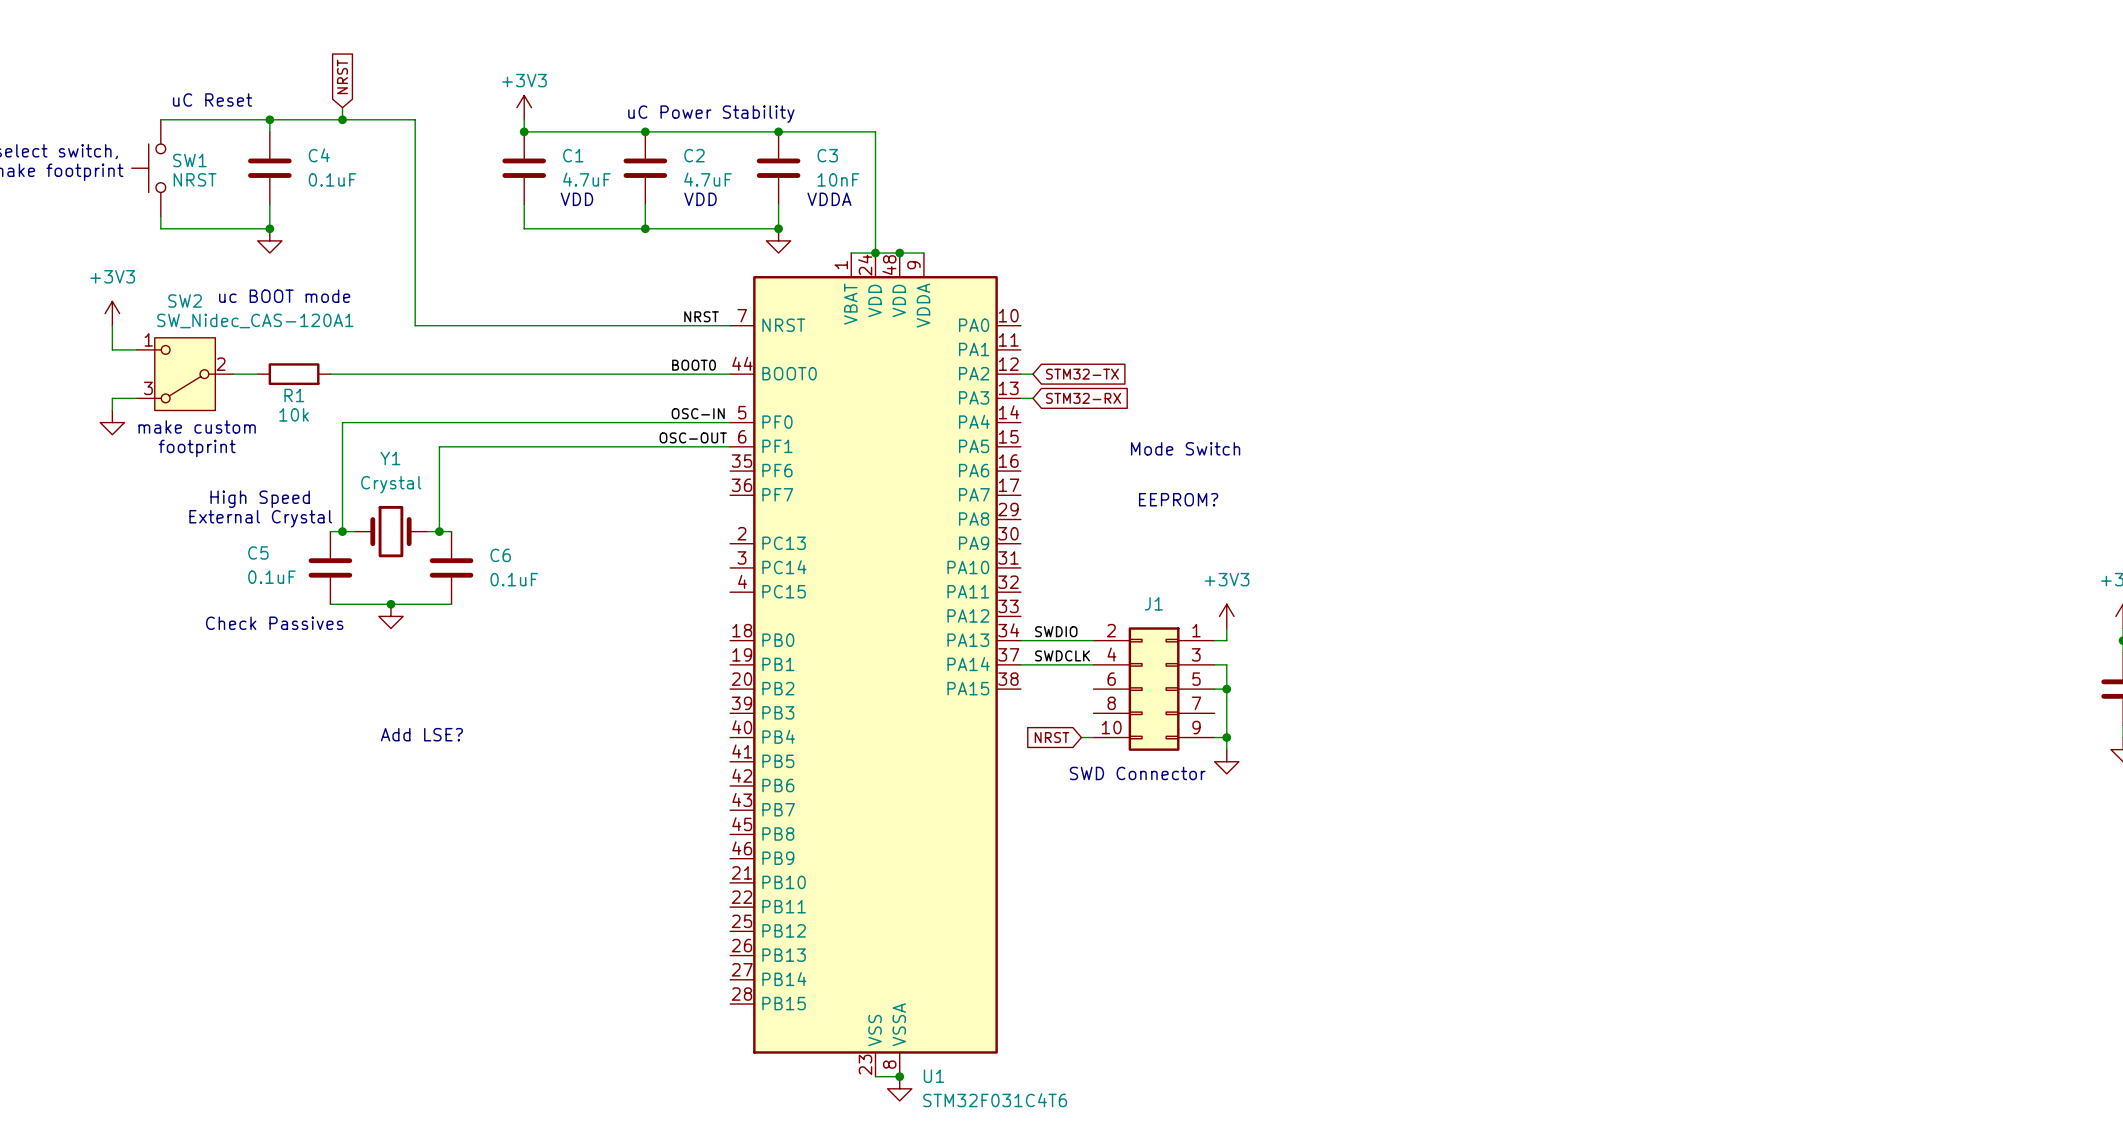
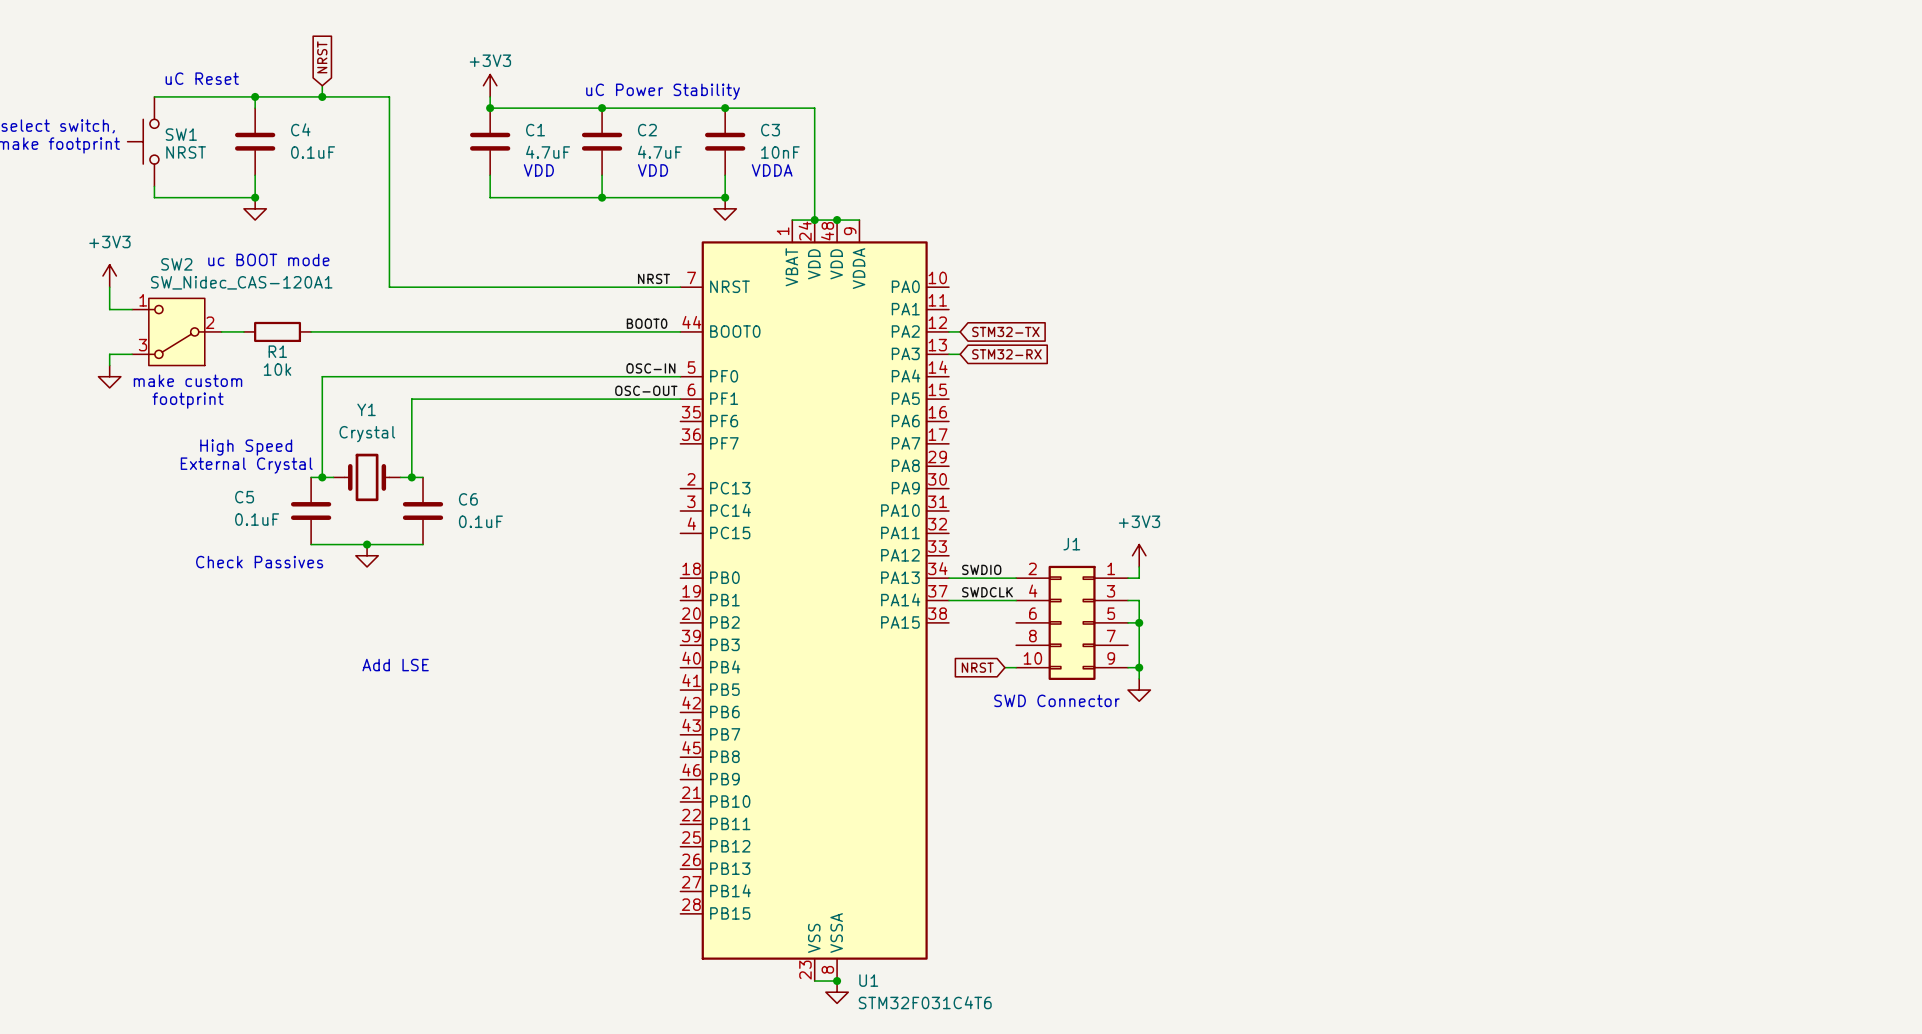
text: Mode Switch (1185, 448) -> none
text: EEPROM? (1178, 499) -> none
text: Add LSE? (421, 734) -> Add LSE (395, 665)

